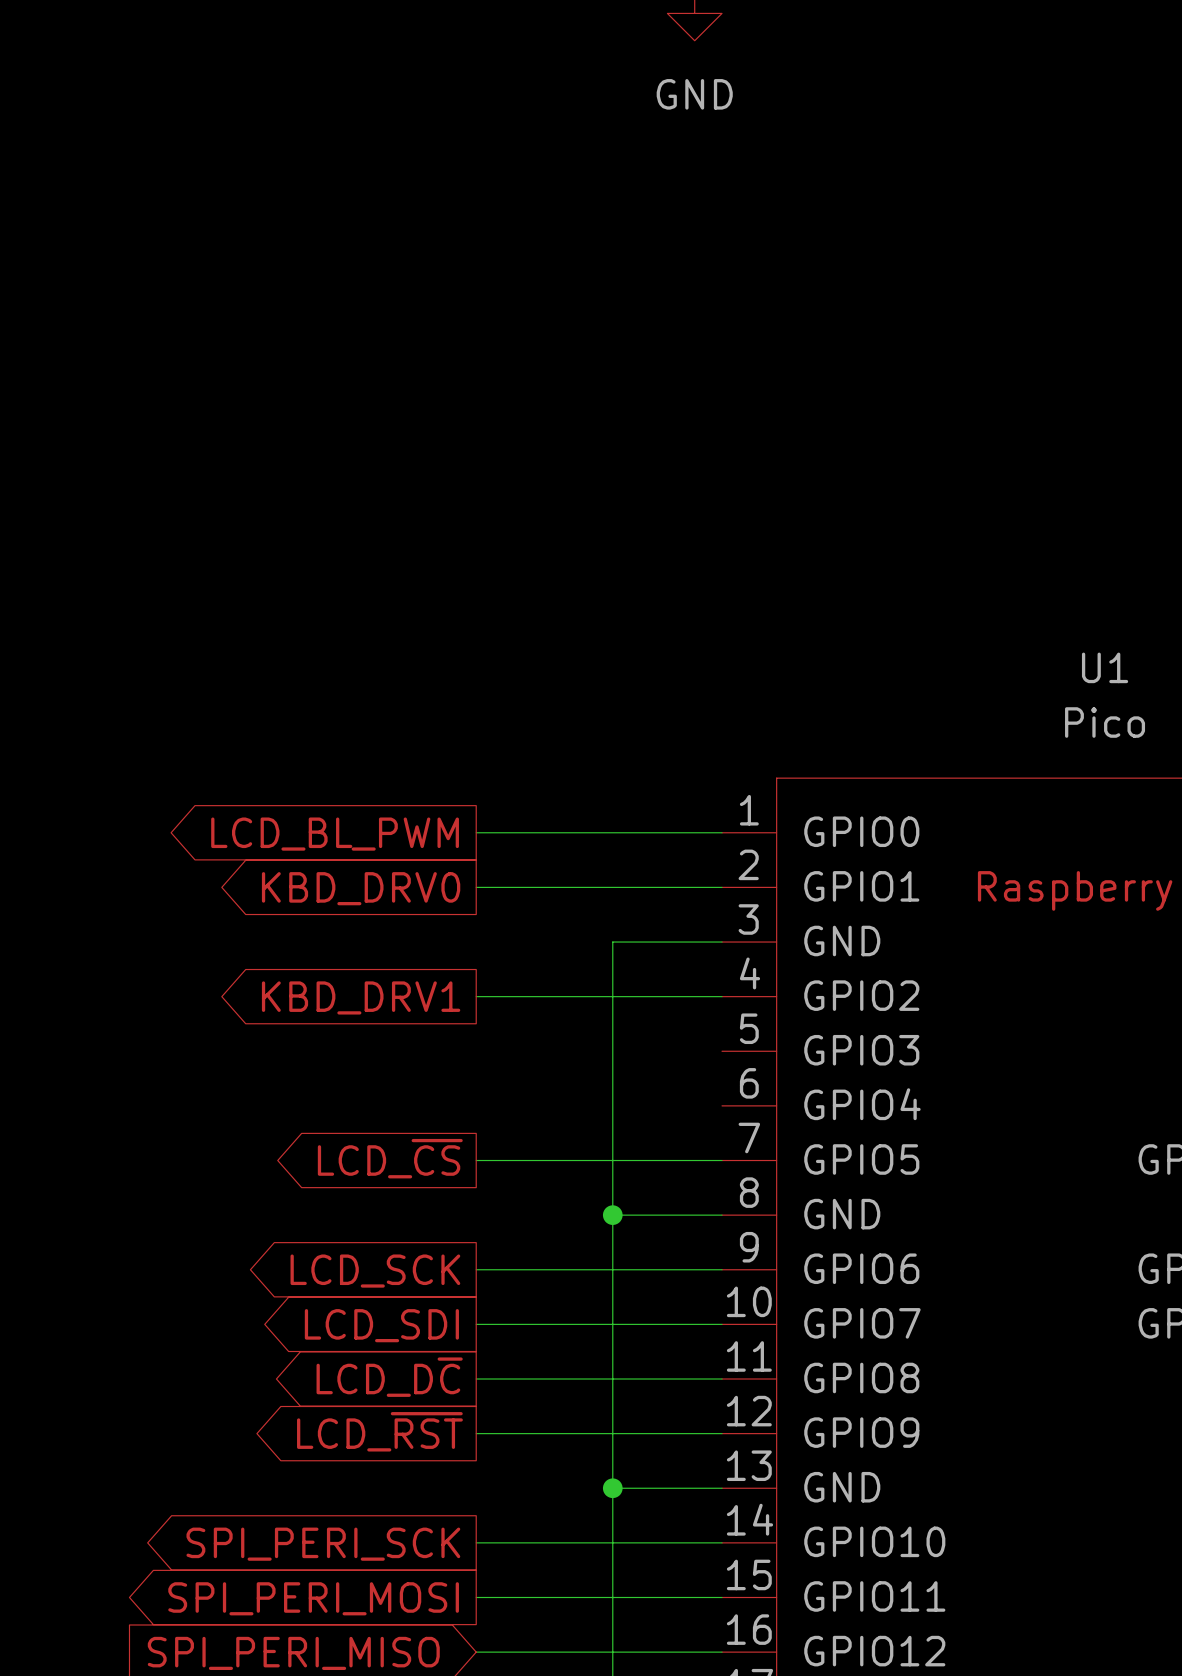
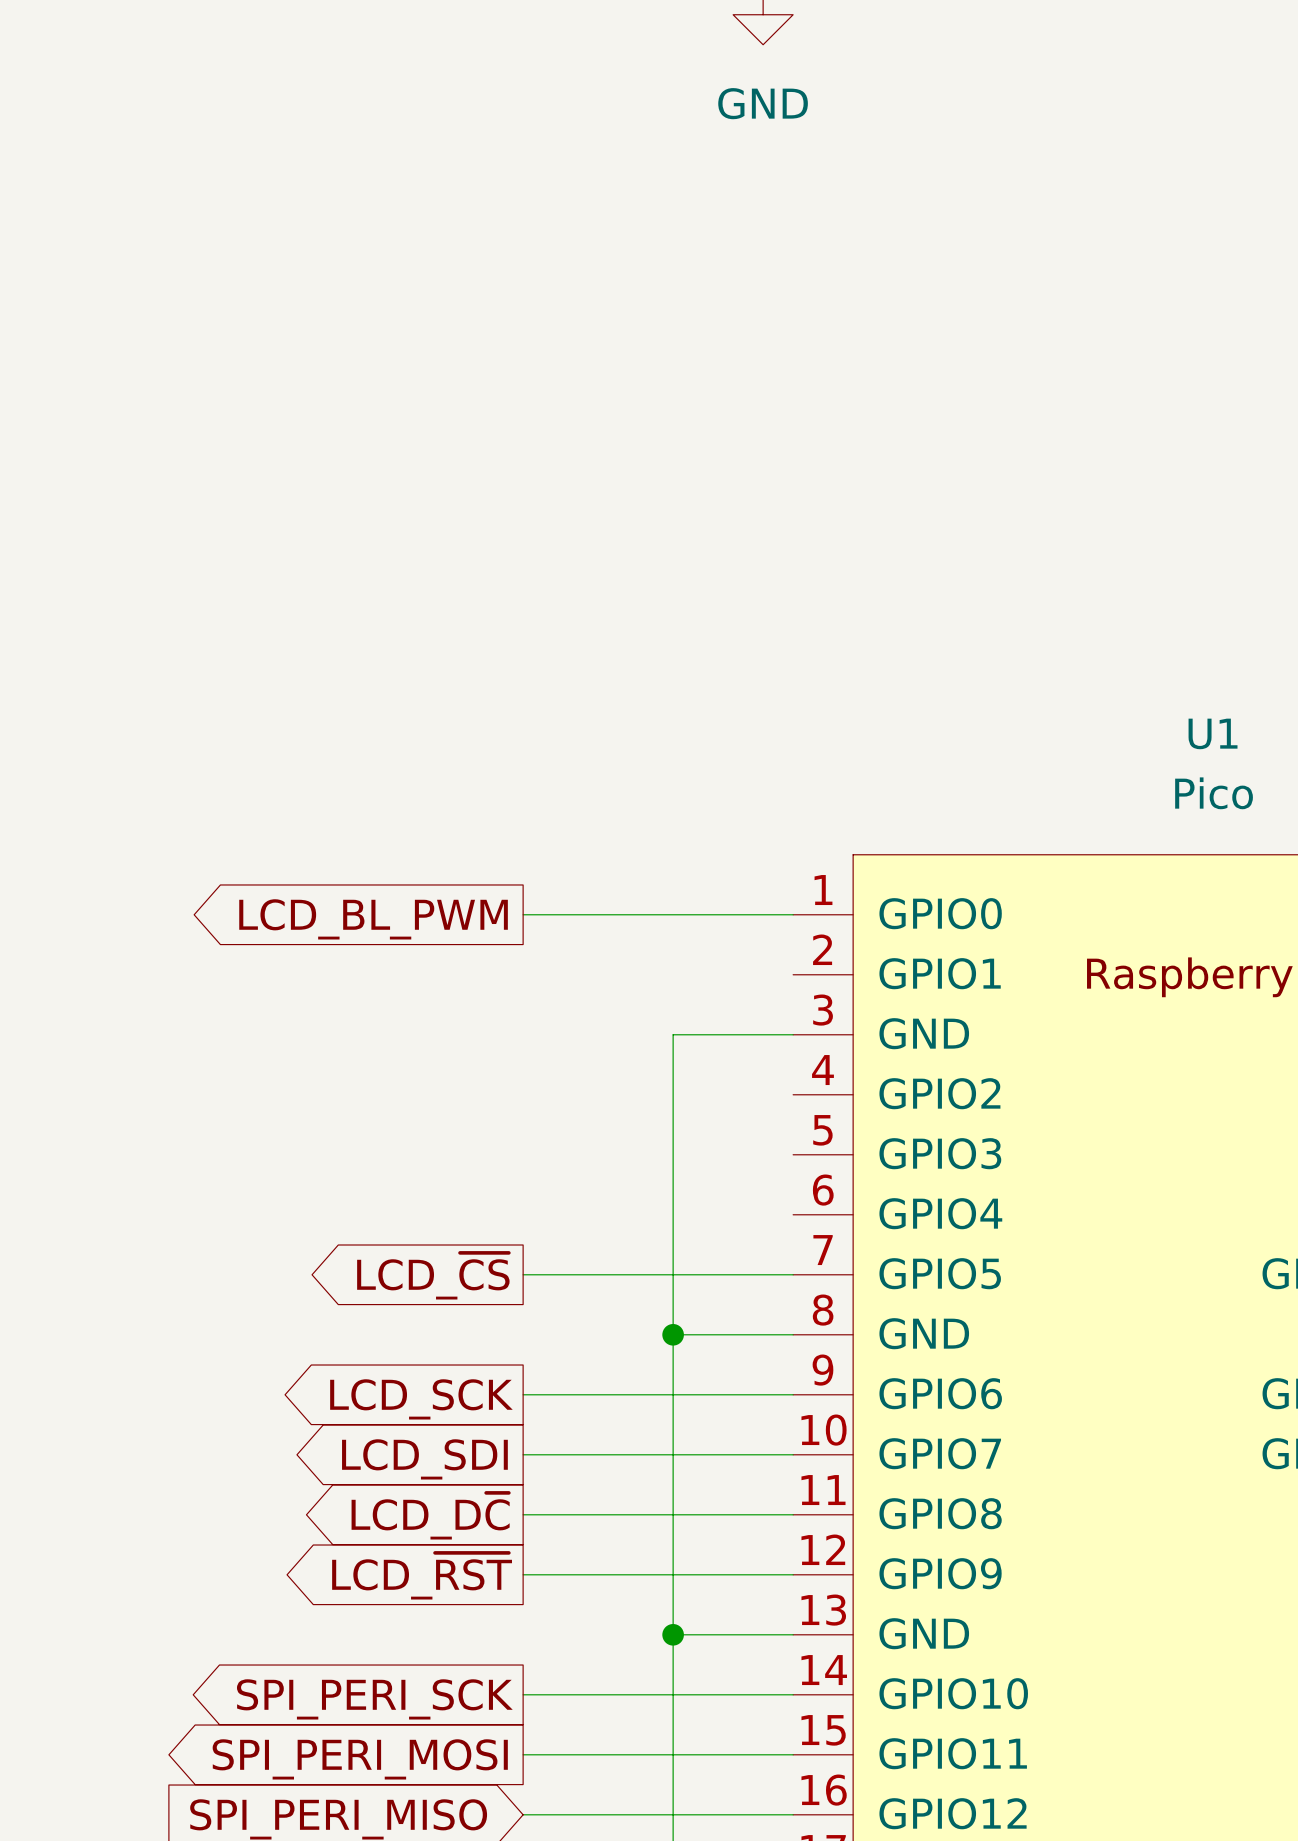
wire: (476, 887) (722, 887) -> none
global label: KBD_DRV0 (361, 888) -> none
wire: (476, 996) (722, 996) -> none
global label: KBD_DRV1 (361, 997) -> none

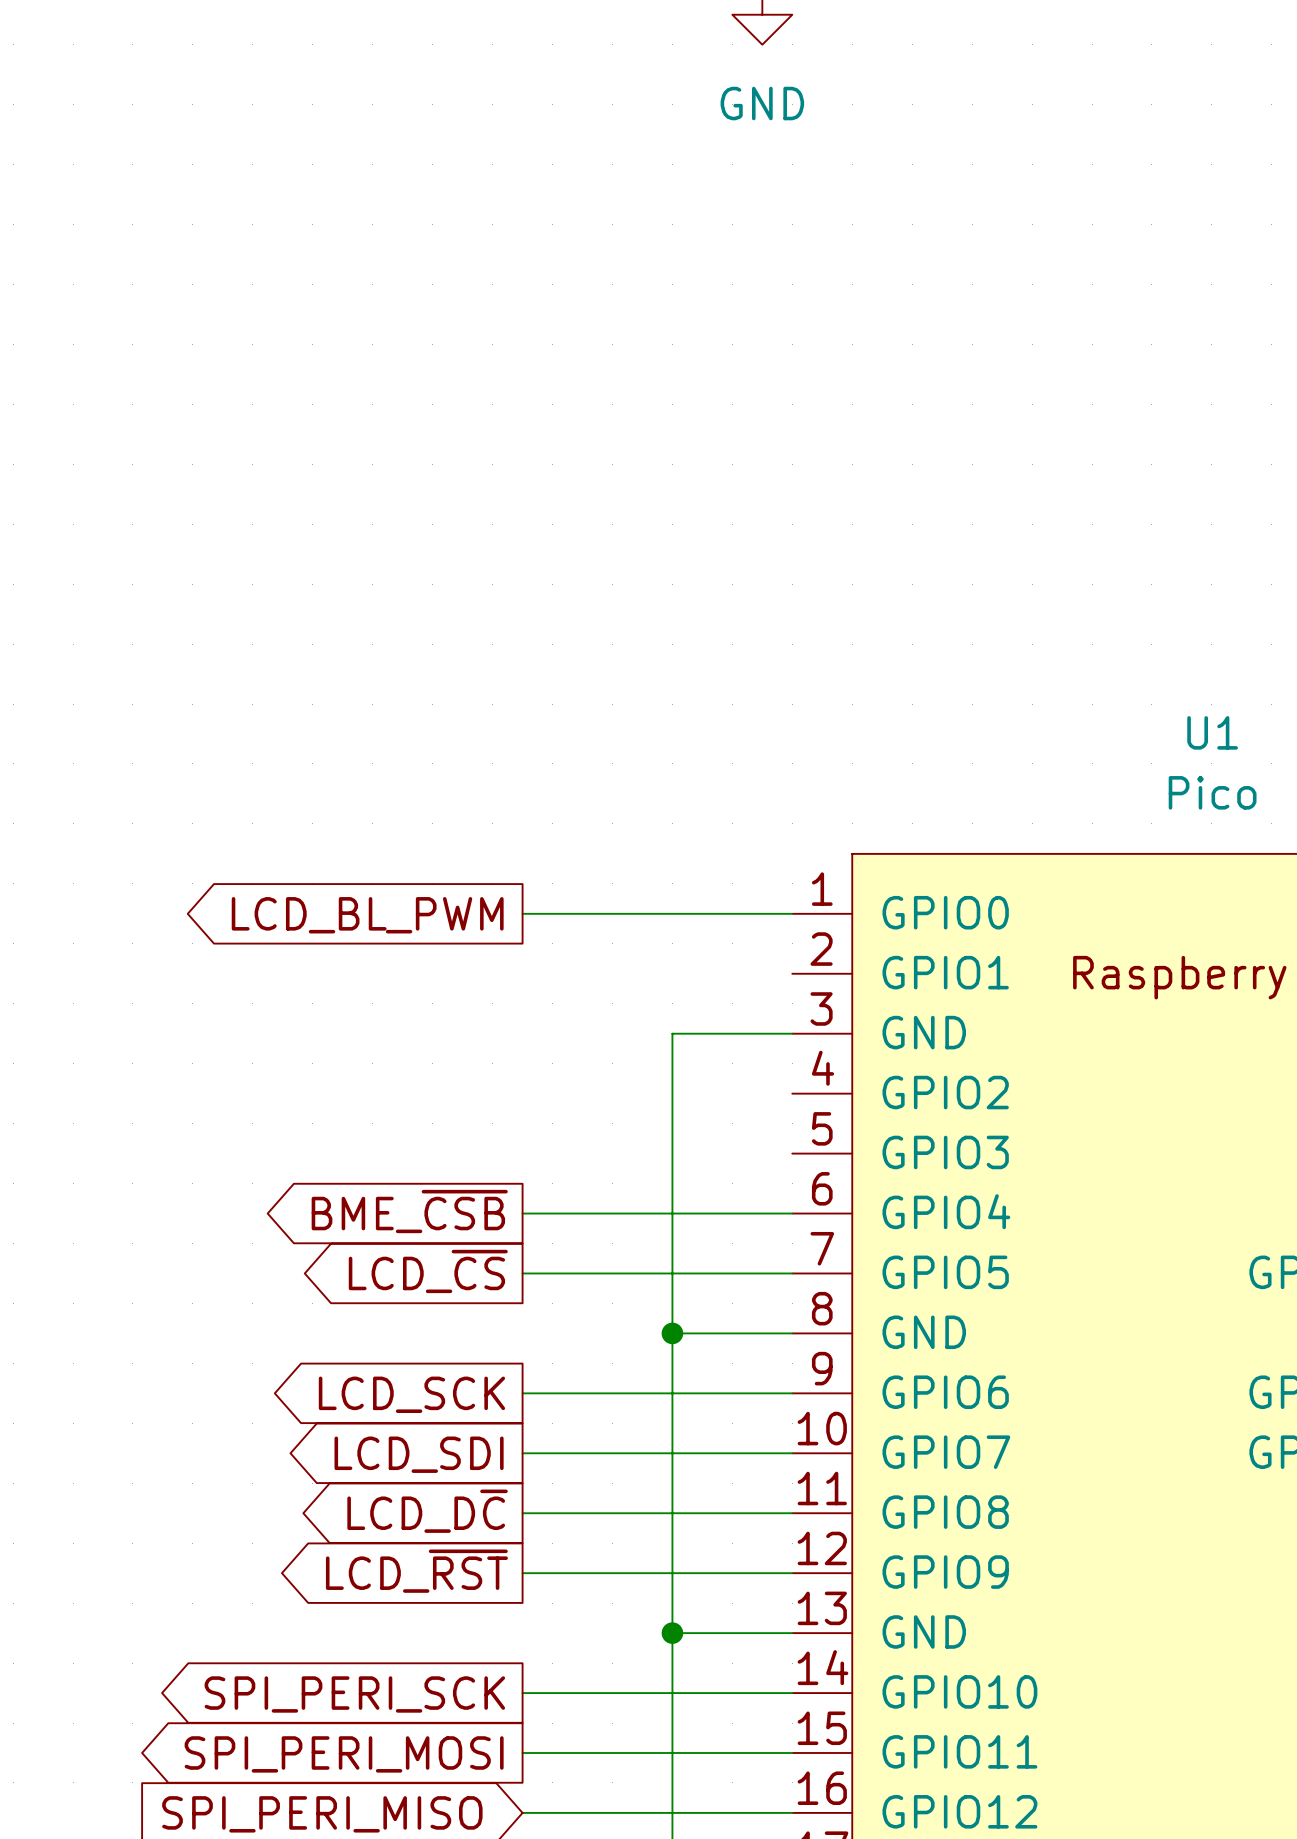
wire: none -> (522, 1213) (792, 1213)
global label: none -> BME_~{CSB} (409, 1211)

